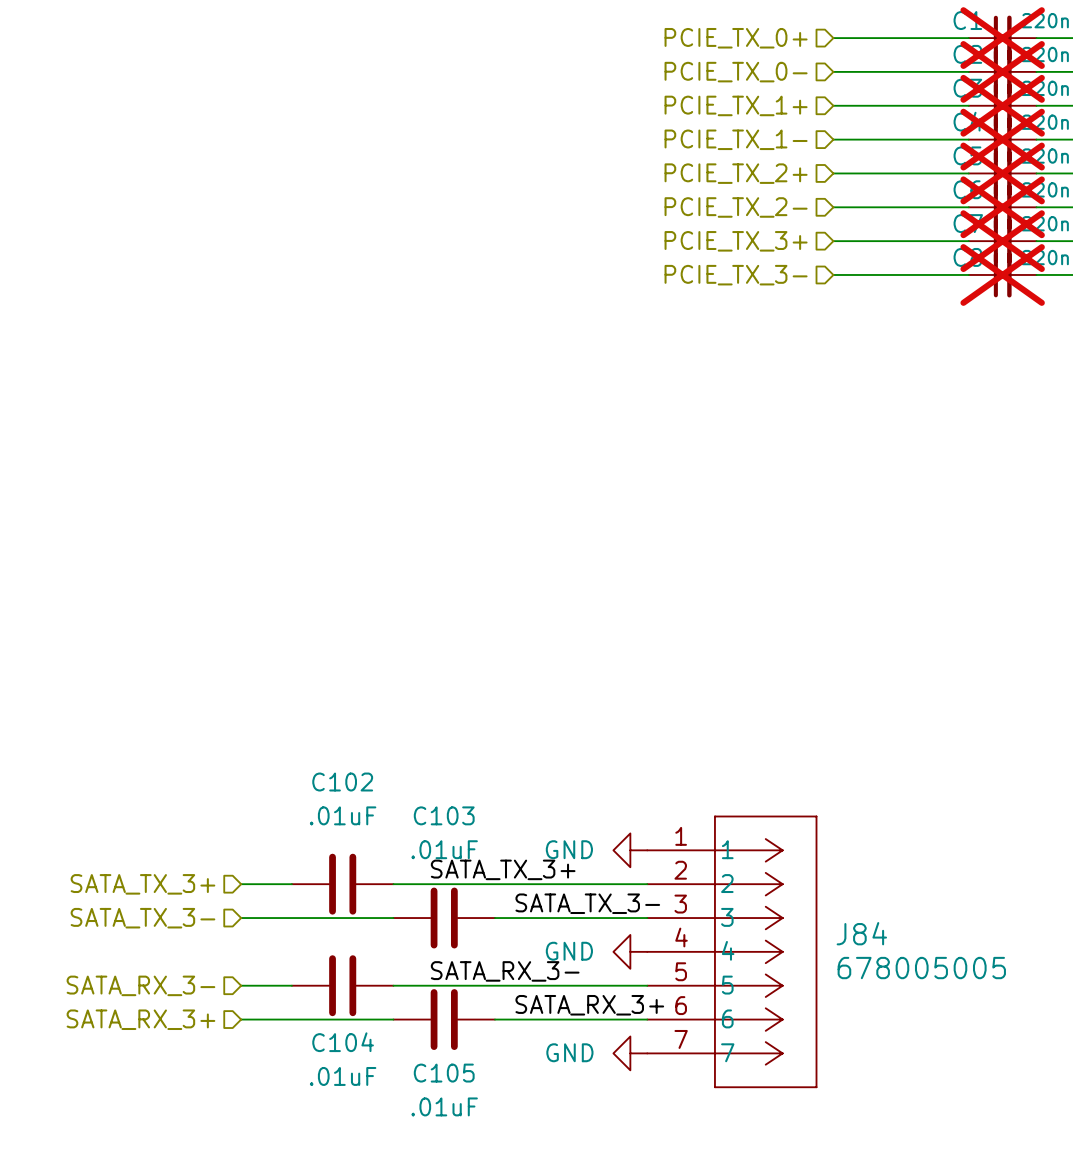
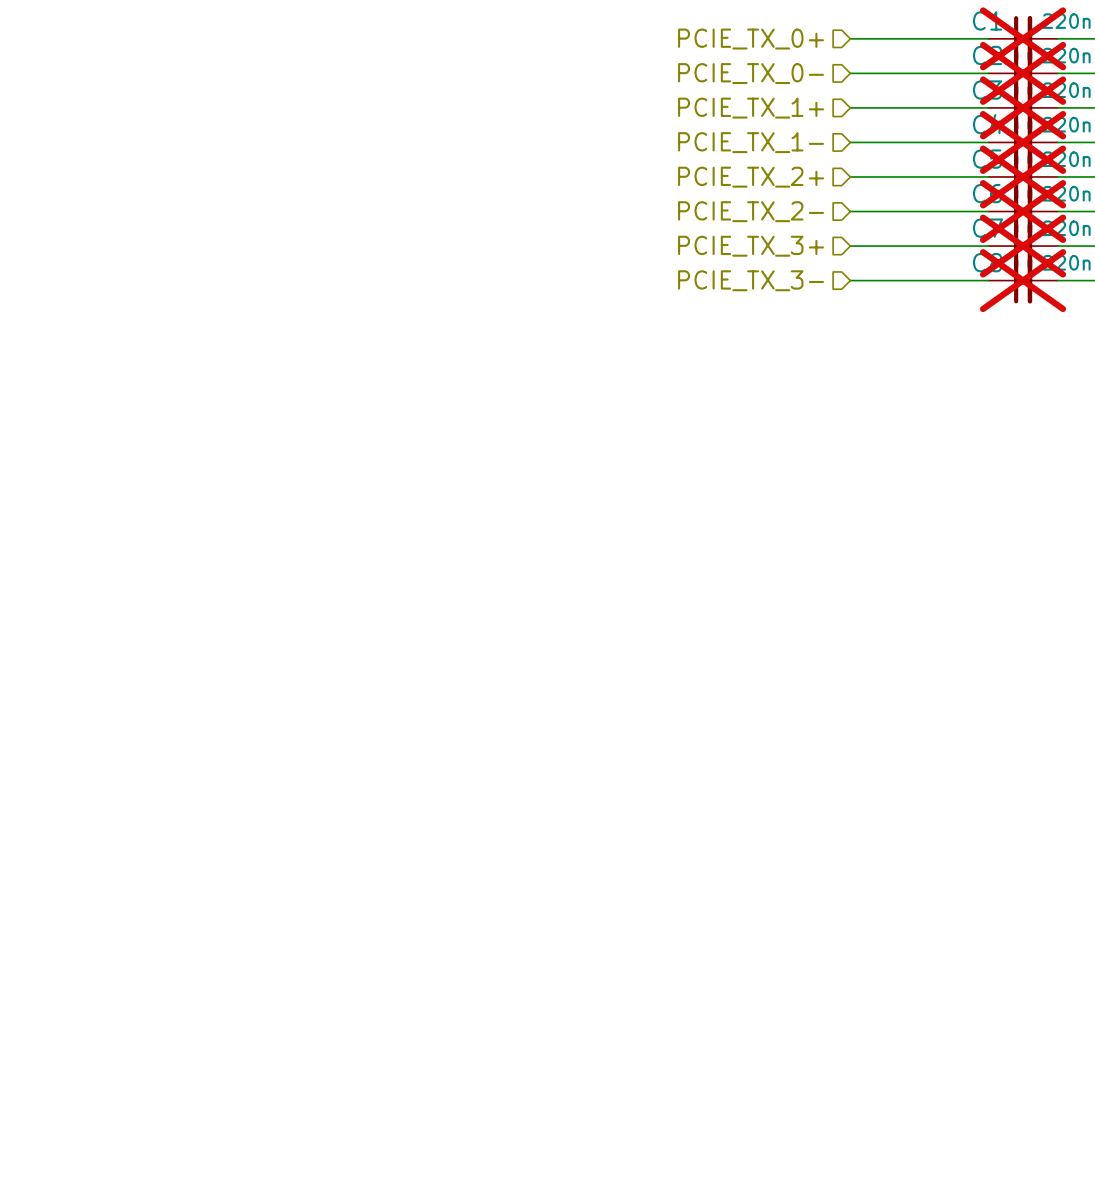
power symbol: GND (630, 850) -> none
label: SATA_TX_3+ (503, 869) -> none
hierarchical label: SATA_TX_3+ (142, 884) -> none
wire: (241, 884) (291, 884) -> none
C102: .01uF (342, 884) -> none
wire: (393, 884) (647, 884) -> none
label: SATA_TX_3- (587, 903) -> none
hierarchical label: SATA_TX_3- (142, 918) -> none
wire: (241, 918) (393, 918) -> none
C103: .01uF (444, 918) -> none
wire: (494, 918) (647, 918) -> none
power symbol: GND (630, 951) -> none
J84: 678005005 (732, 951) -> none
label: SATA_RX_3- (505, 971) -> none
hierarchical label: SATA_RX_3- (140, 985) -> none
wire: (241, 985) (291, 985) -> none
C104: .01uF (342, 985) -> none
wire: (393, 985) (647, 985) -> none
label: SATA_RX_3+ (589, 1005) -> none
hierarchical label: SATA_RX_3+ (140, 1019) -> none
wire: (241, 1019) (393, 1019) -> none
C105: .01uF (444, 1019) -> none
wire: (494, 1019) (647, 1019) -> none
power symbol: GND (630, 1053) -> none

